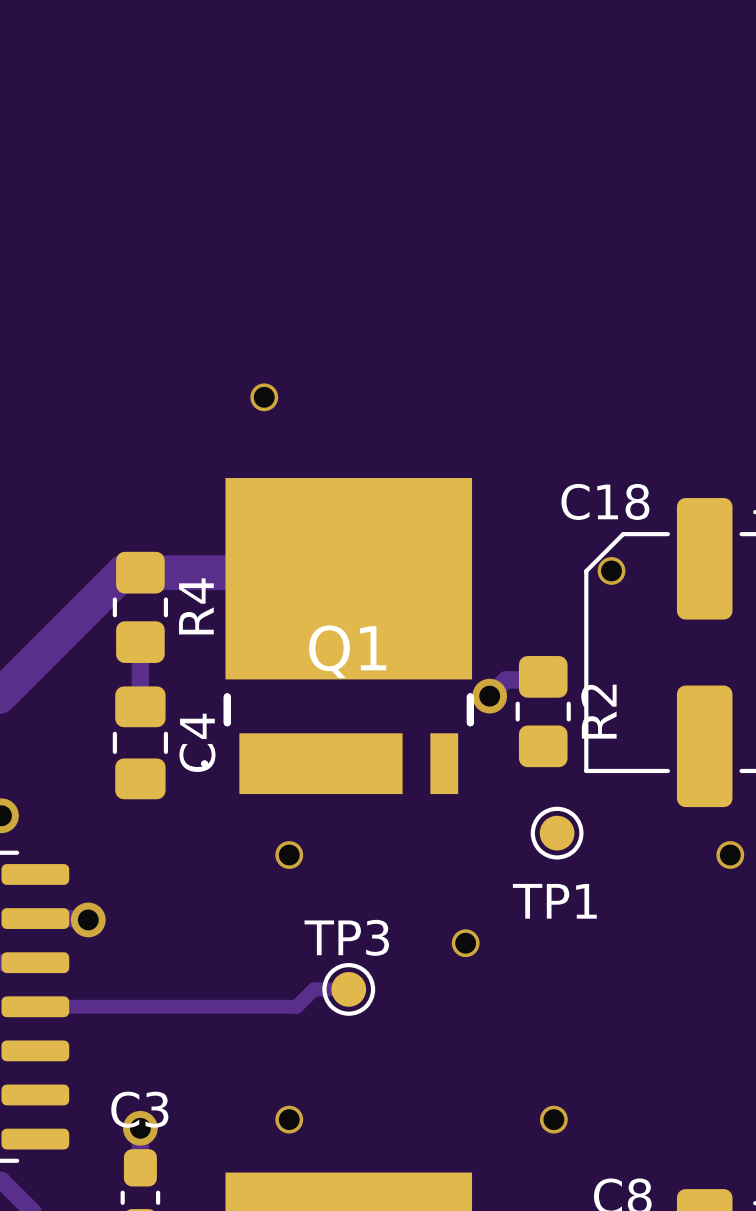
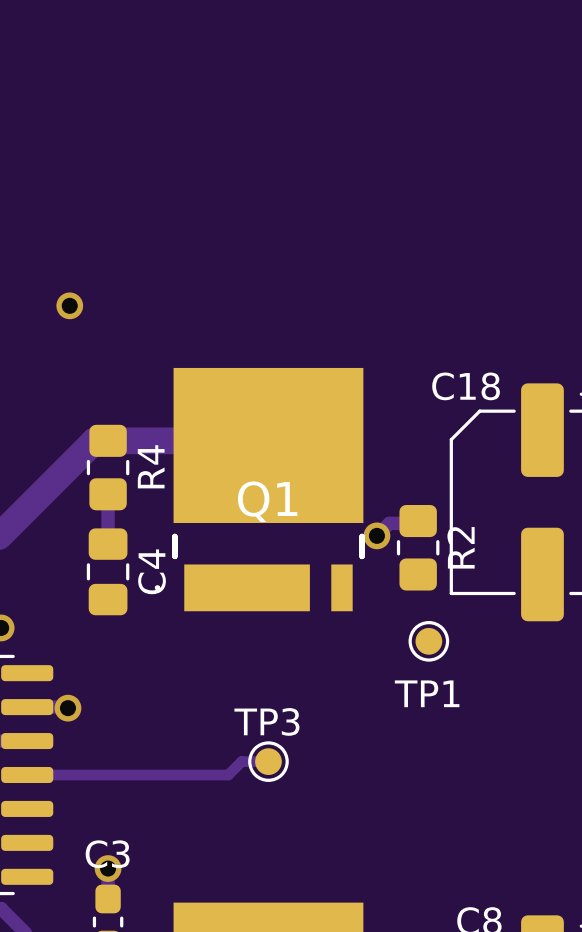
via: none -> (69, 305)
via: (264, 397) -> none
via: (611, 570) -> none
via: (289, 855) -> none
via: (730, 855) -> none
via: (465, 943) -> none
via: (289, 1119) -> none
via: (553, 1119) -> none

